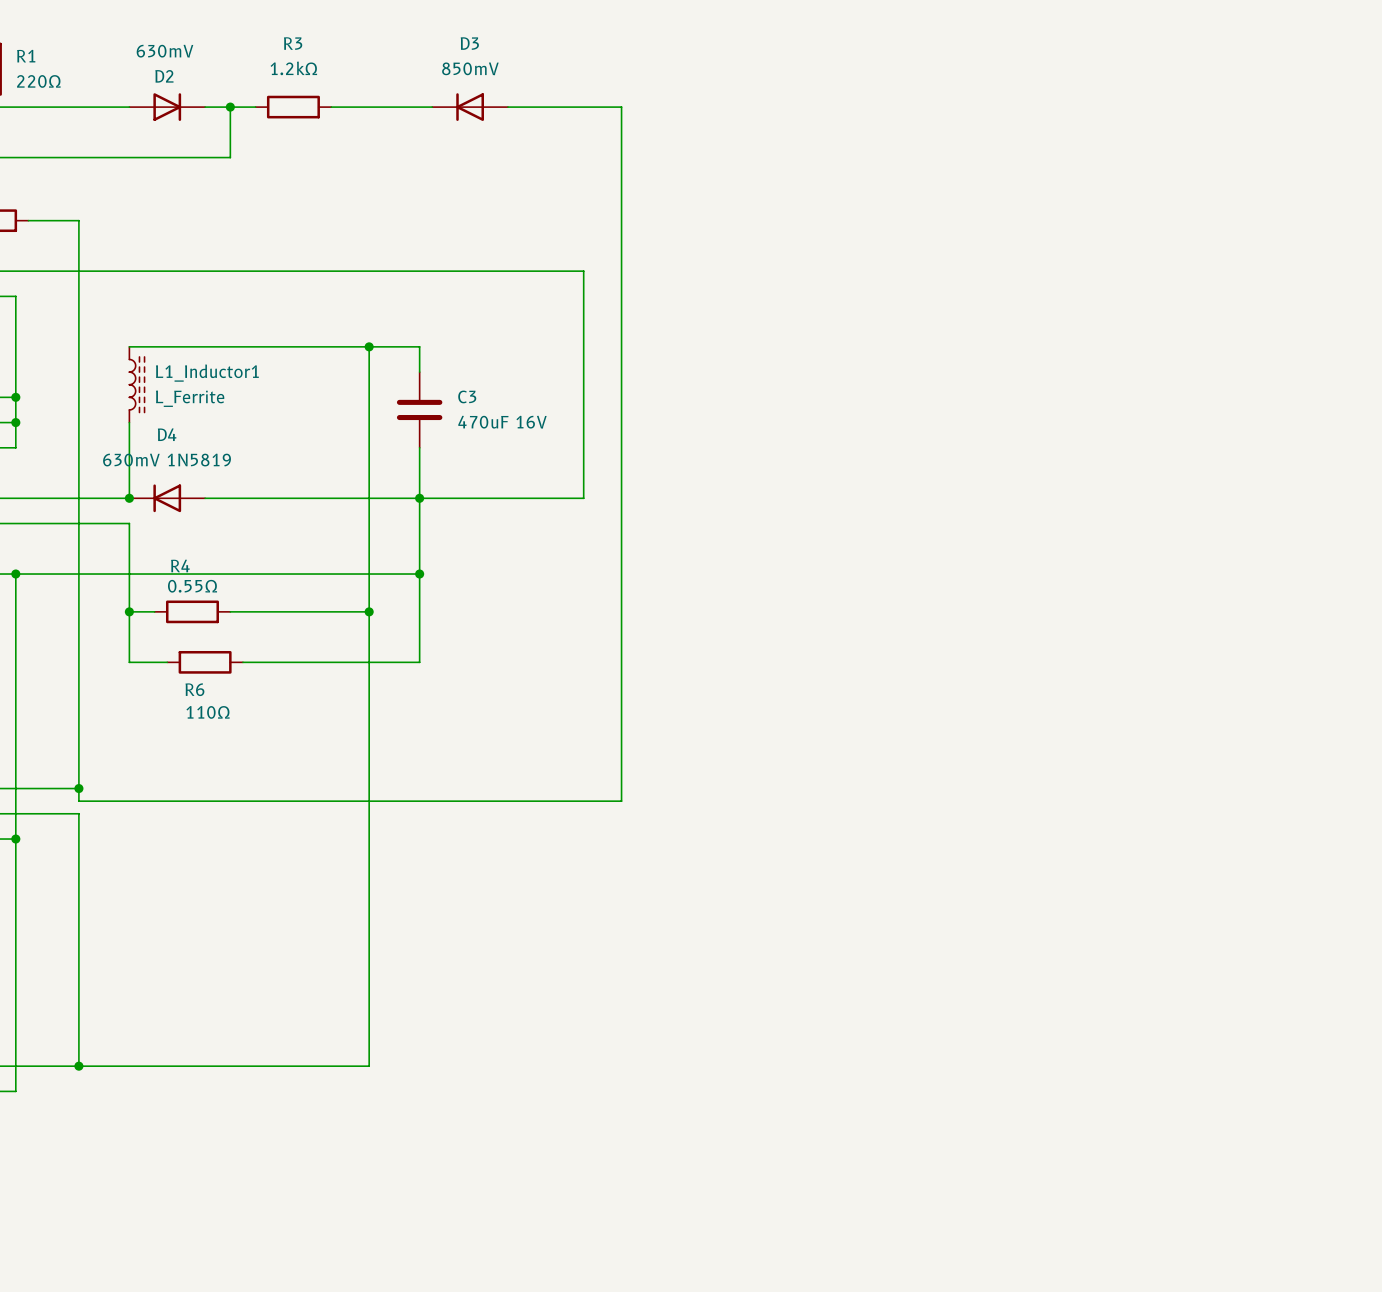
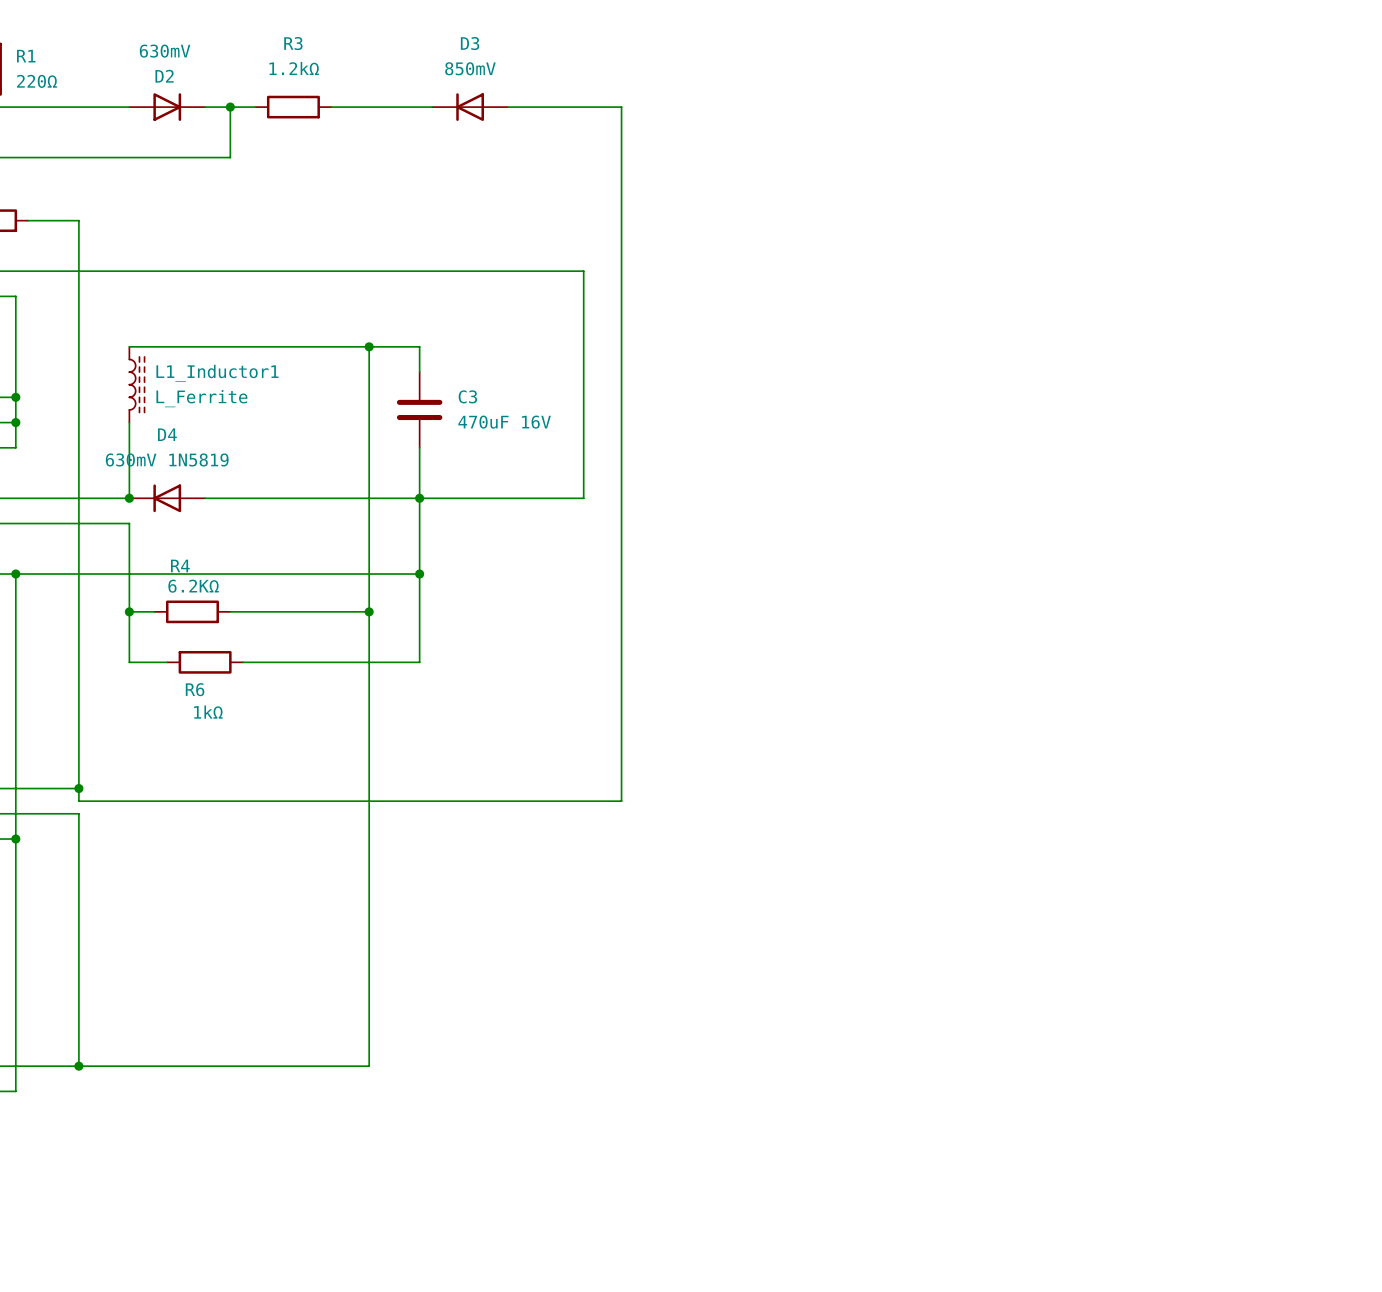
R4 value: 0.55Ω (192, 586) -> 6.2KΩ (193, 586)
R6 value: 110Ω (208, 712) -> 1kΩ (208, 712)

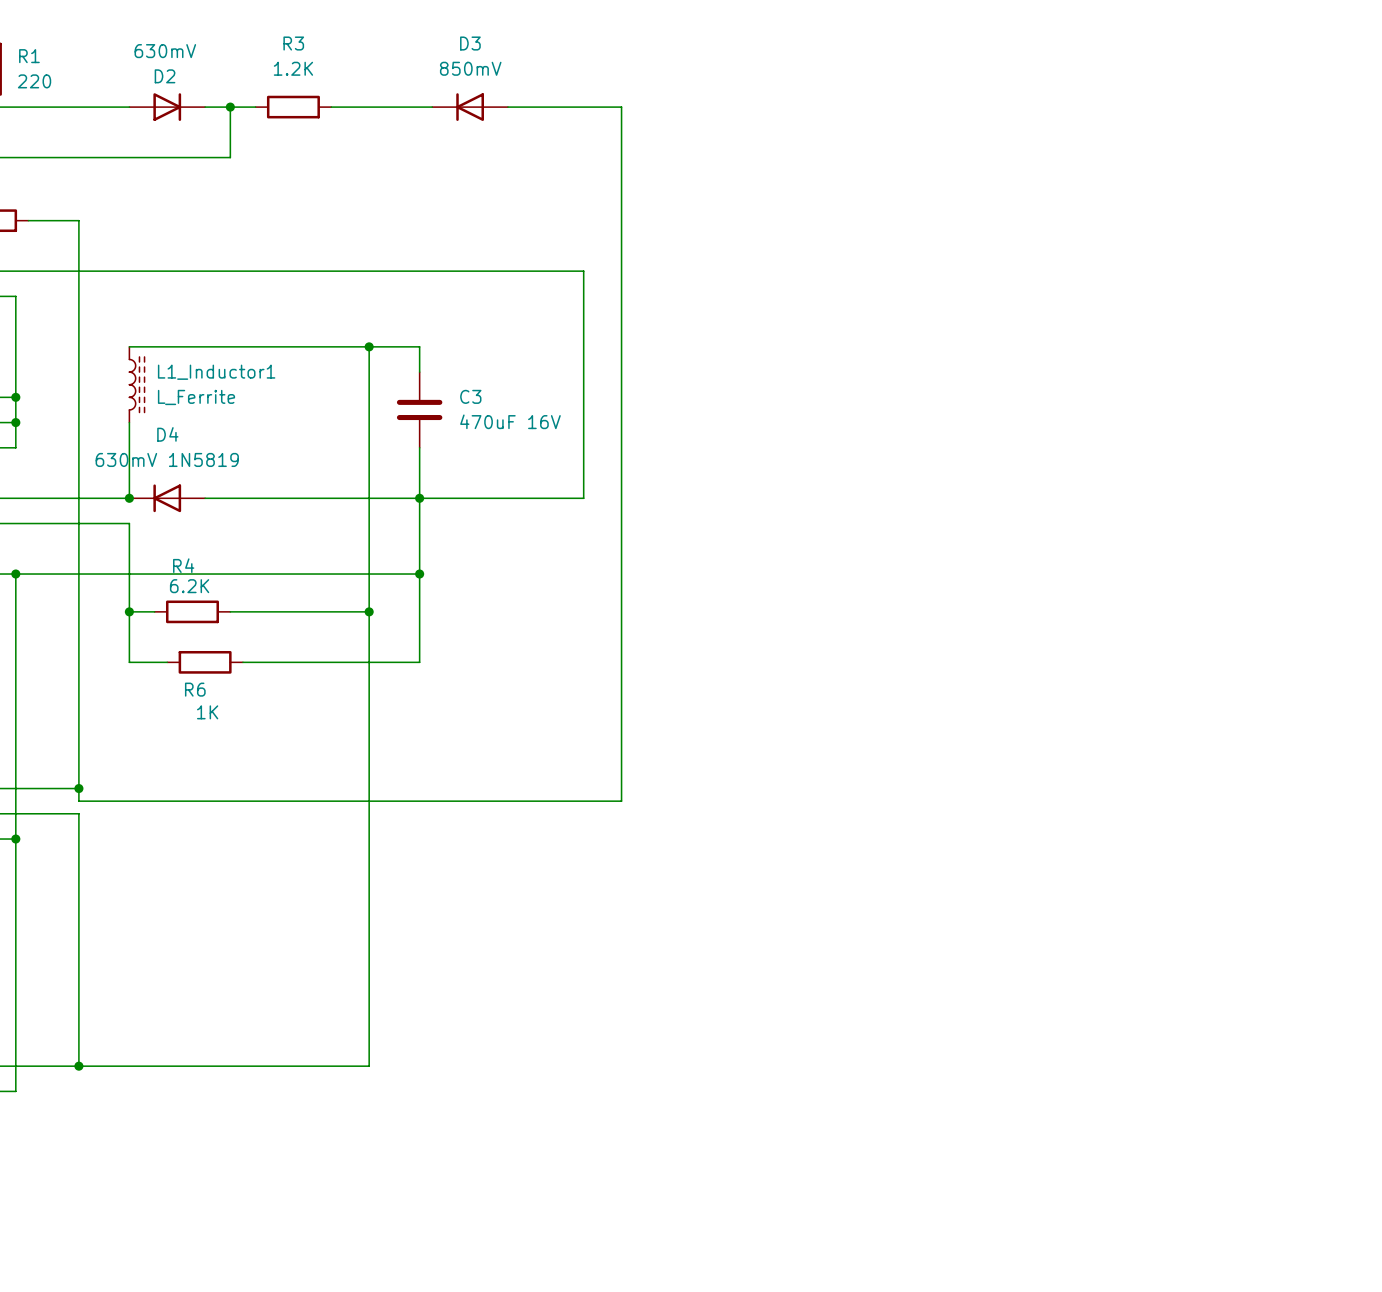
R3 value: 1.2kΩ (294, 68) -> 1.2K (293, 68)
R1 value: 220Ω (36, 81) -> 220 (34, 81)
R4 value: 6.2KΩ (193, 586) -> 6.2K (189, 586)
R6 value: 1kΩ (208, 712) -> 1K (207, 712)

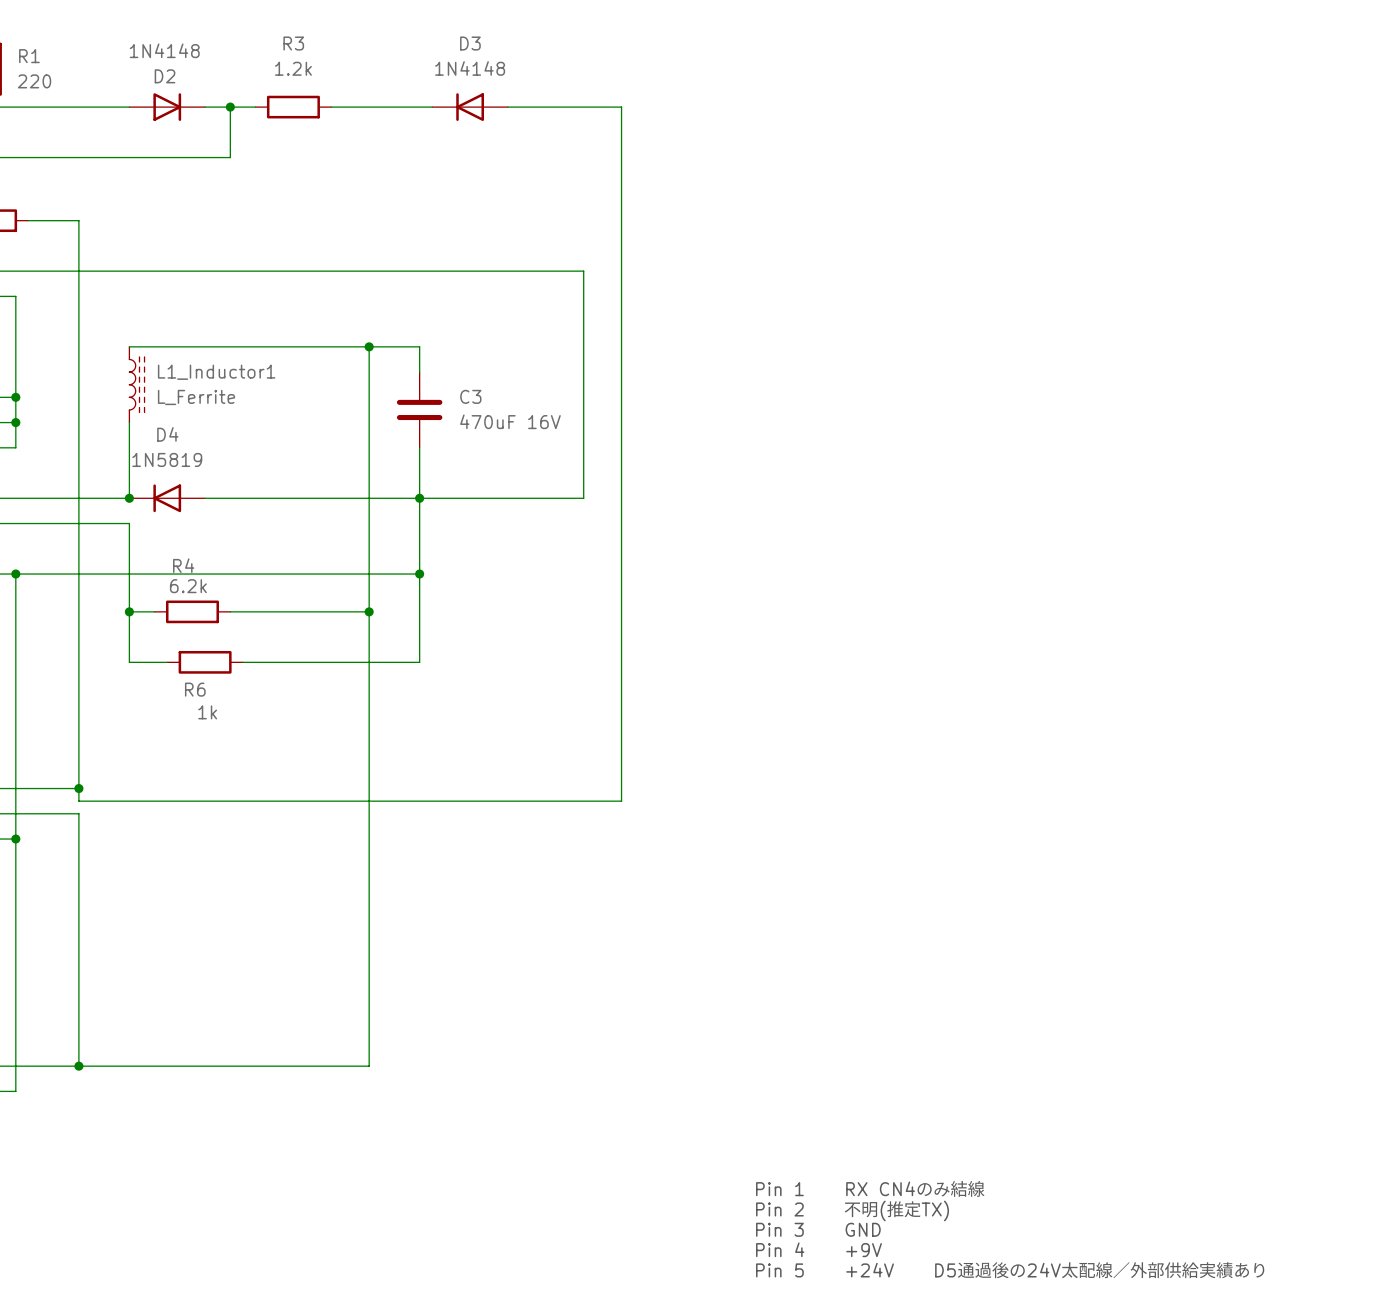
D2 value: 630mV (165, 51) -> 1N4148 (164, 50)
R3 value: 1.2K (293, 68) -> 1.2k (293, 68)
D3 value: 850mV (470, 68) -> 1N4148 (470, 68)
D4 value: 630mV 1N5819 (167, 459) -> 1N5819 (167, 459)
R4 value: 6.2K (189, 586) -> 6.2k (188, 586)
R6 value: 1K (207, 712) -> 1k (207, 712)
text: none -> Pin 1 RX CN4のみ結線 (870, 1188)
text: none -> Pin 2 不明(推定TX) (852, 1210)
text: none -> Pin 3 GND (818, 1229)
text: none -> Pin 4 +9V (818, 1249)
text: none -> Pin 5 +24V D5通過後の24V太配線／外部供給実績あり (1010, 1270)

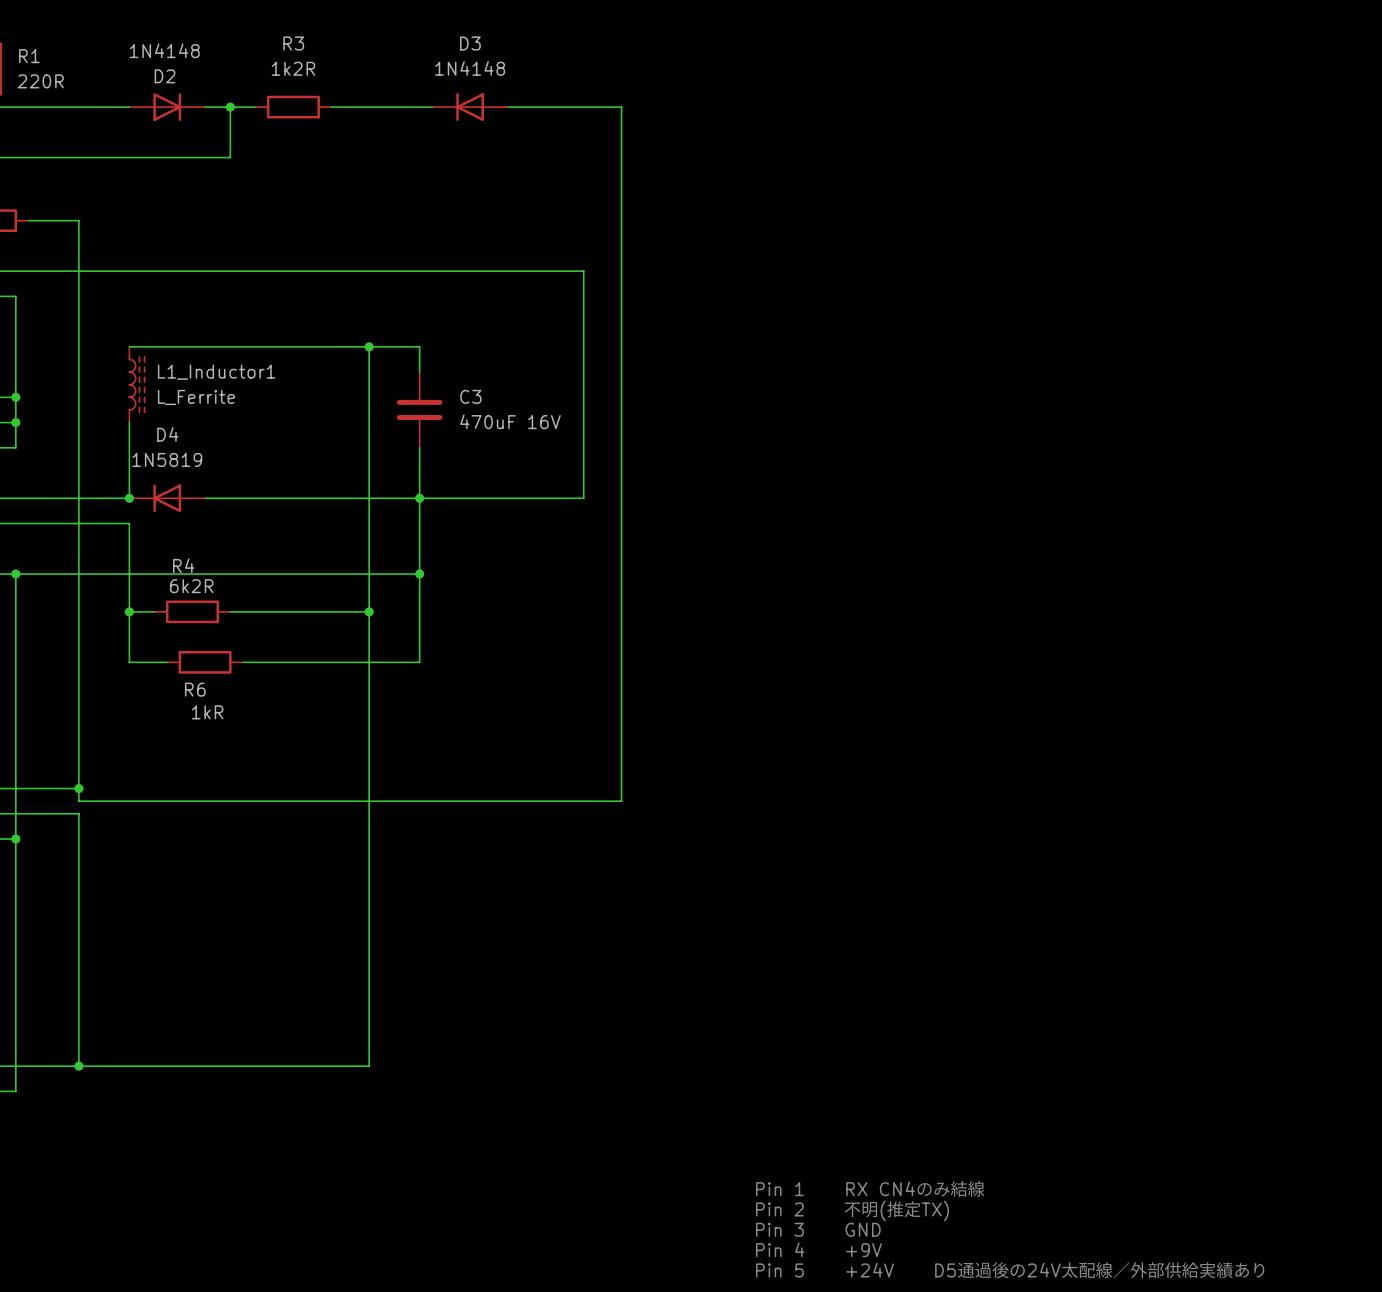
R3 value: 1.2k (293, 68) -> 1k2R (293, 68)
R1 value: 220 (34, 81) -> 220R (40, 81)
R4 value: 6.2k (188, 586) -> 6k2R (191, 586)
R6 value: 1k (207, 712) -> 1kR (207, 712)

